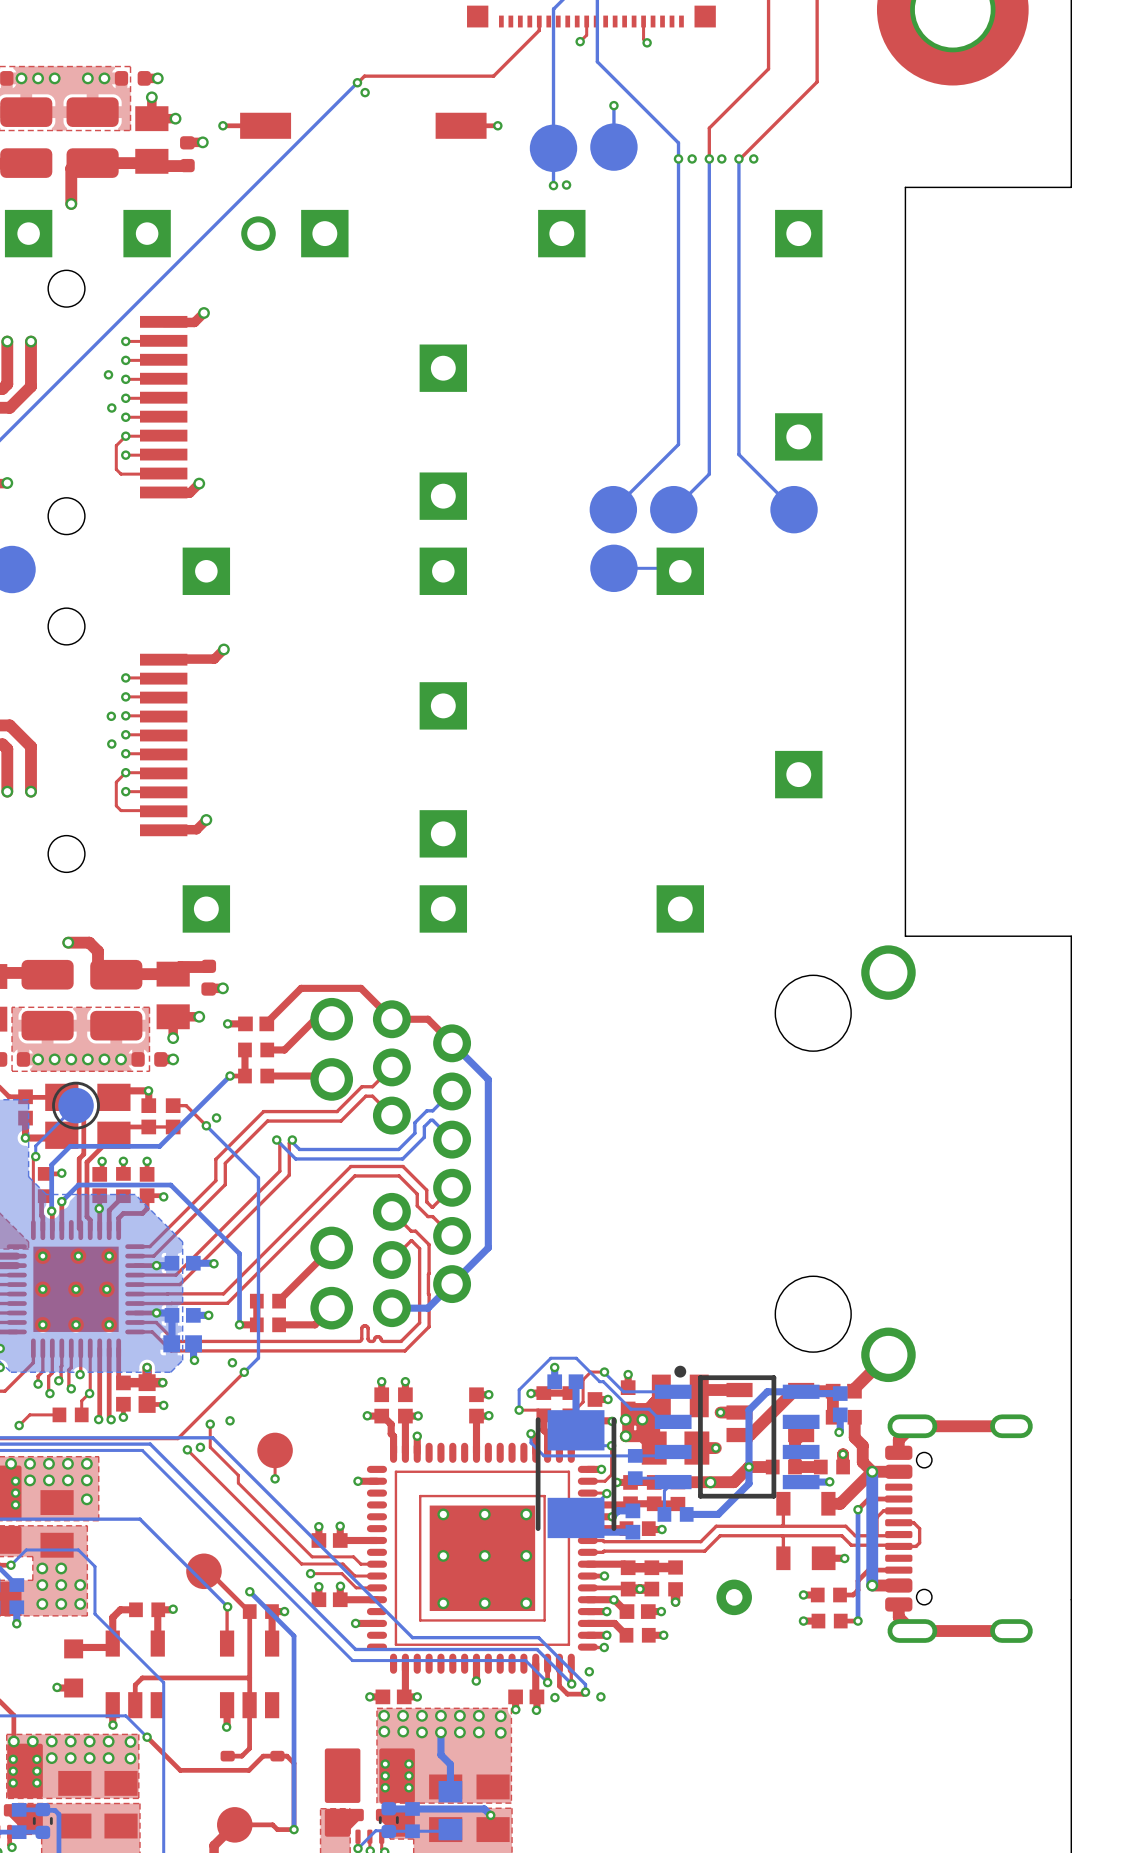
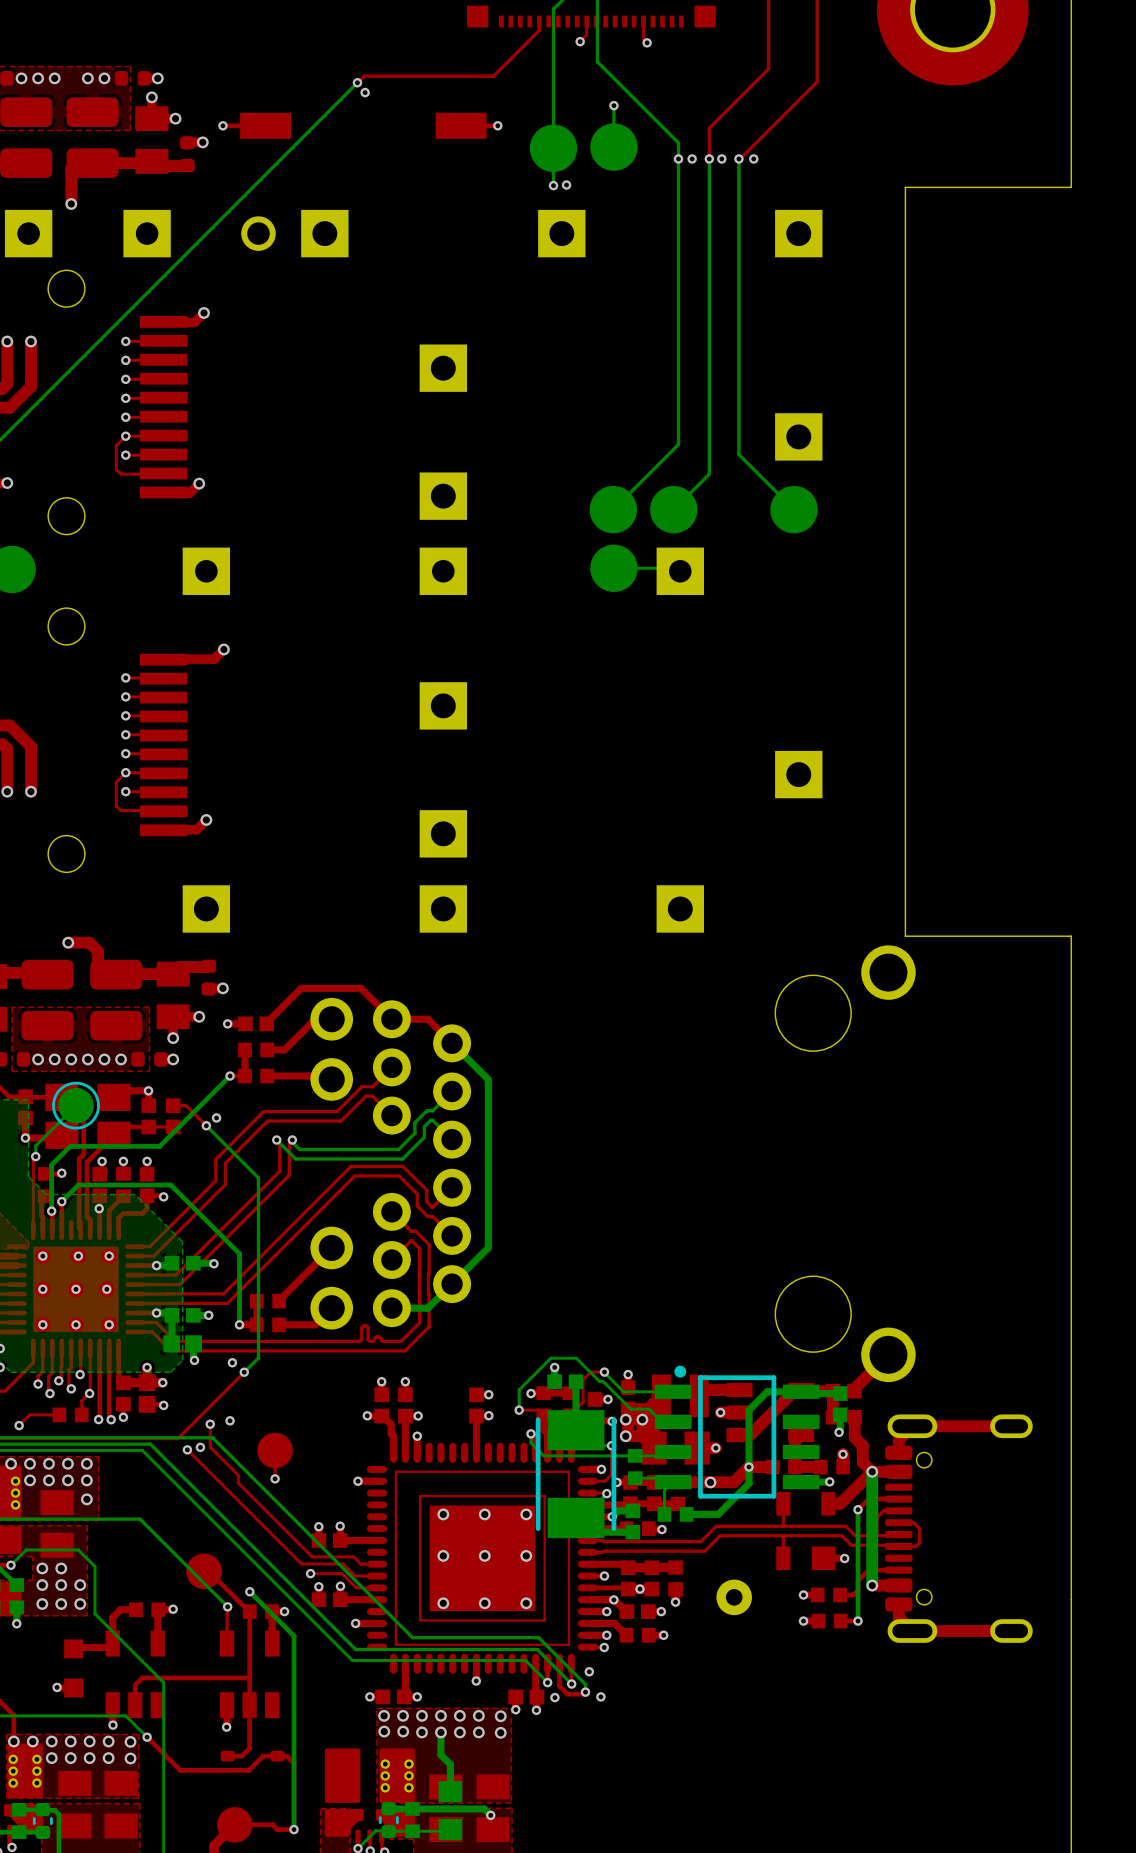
via: (108, 374) -> none
via: (111, 408) -> none
via: (111, 716) -> none
via: (111, 744) -> none

